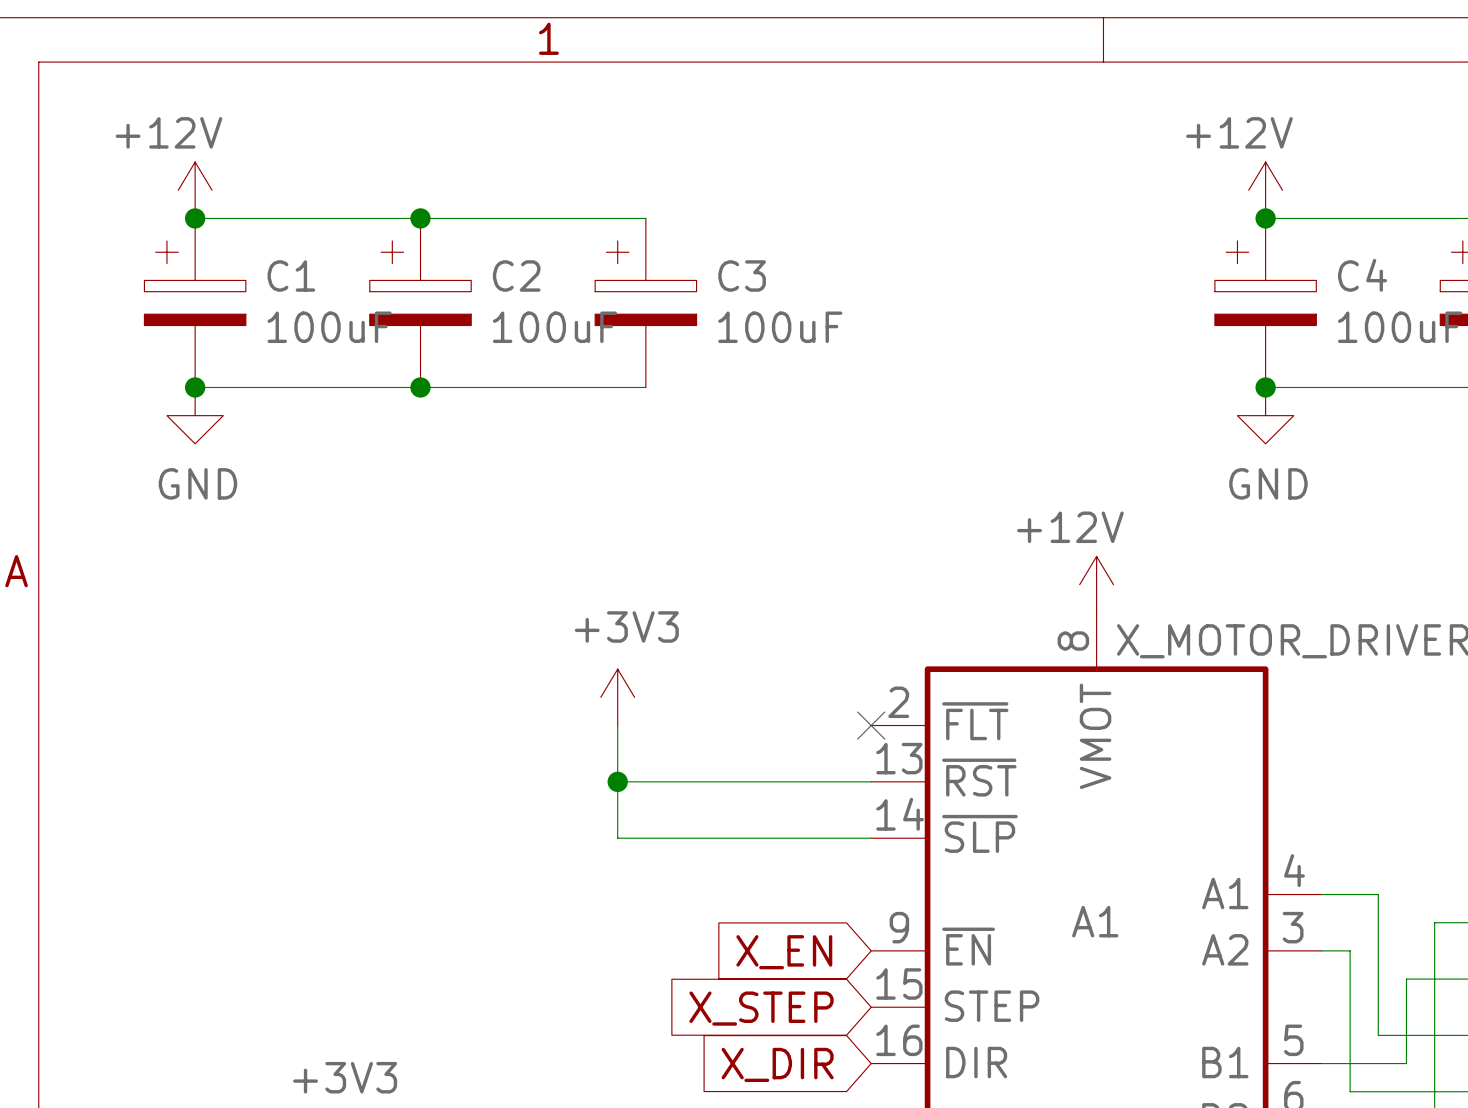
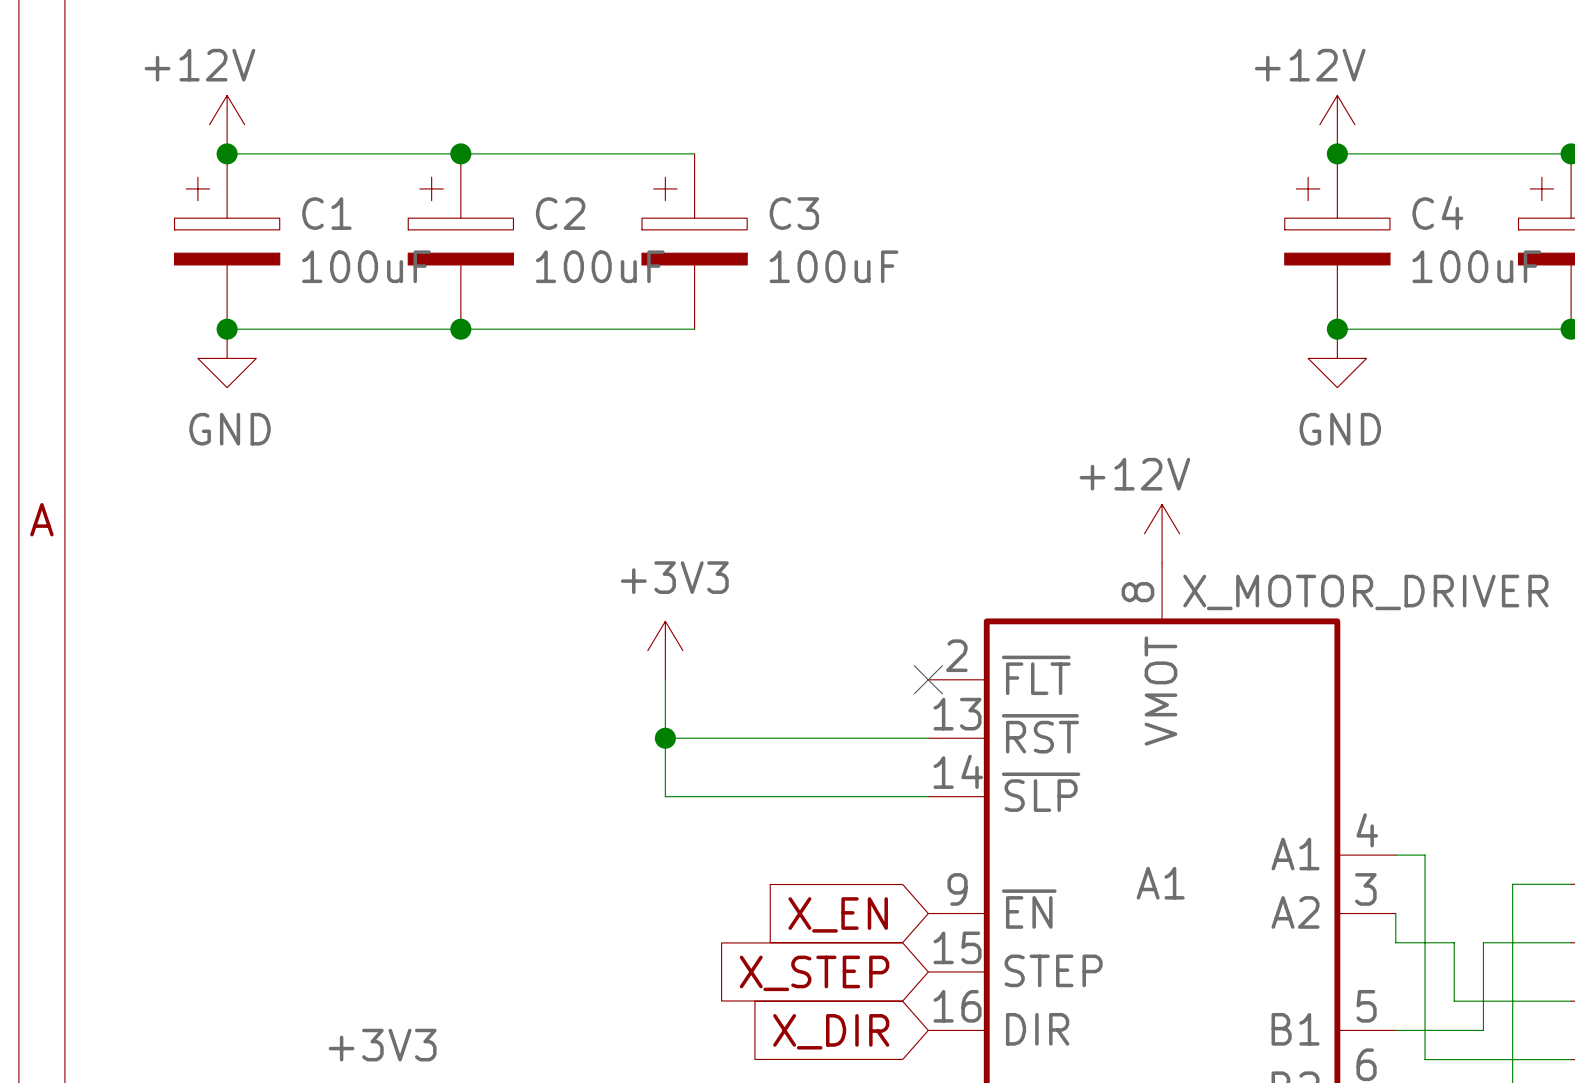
wire: (1350, 894) (1378, 894) (1378, 979) -> (1425, 855) (1425, 913)
wire: (1321, 950) (1350, 950) -> (1395, 913) (1395, 942) (1454, 942)

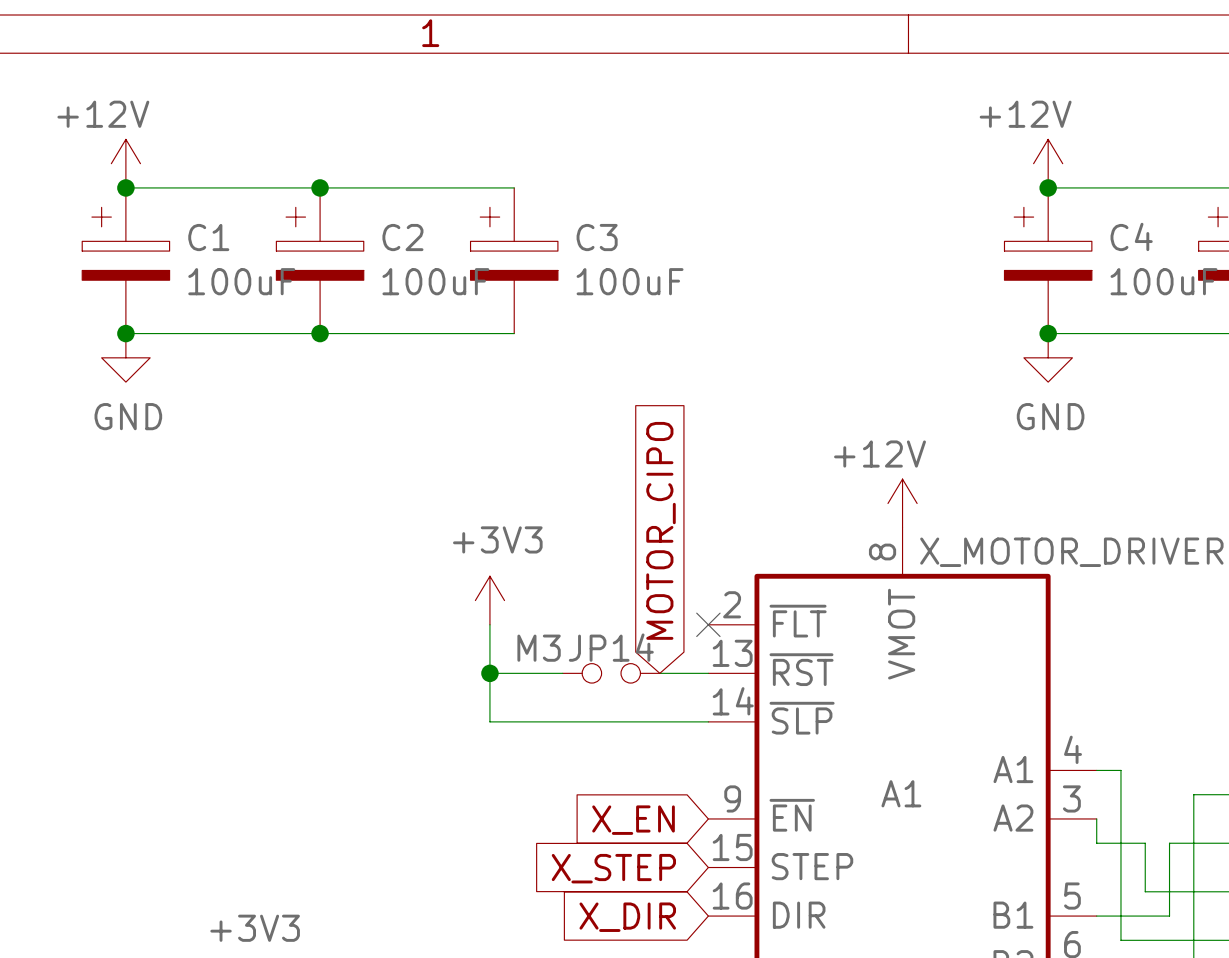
global label: none -> MOTOR_CIPO (661, 530)
wire: (753, 738) (869, 738) -> none
JP14: none -> M3 (611, 673)

